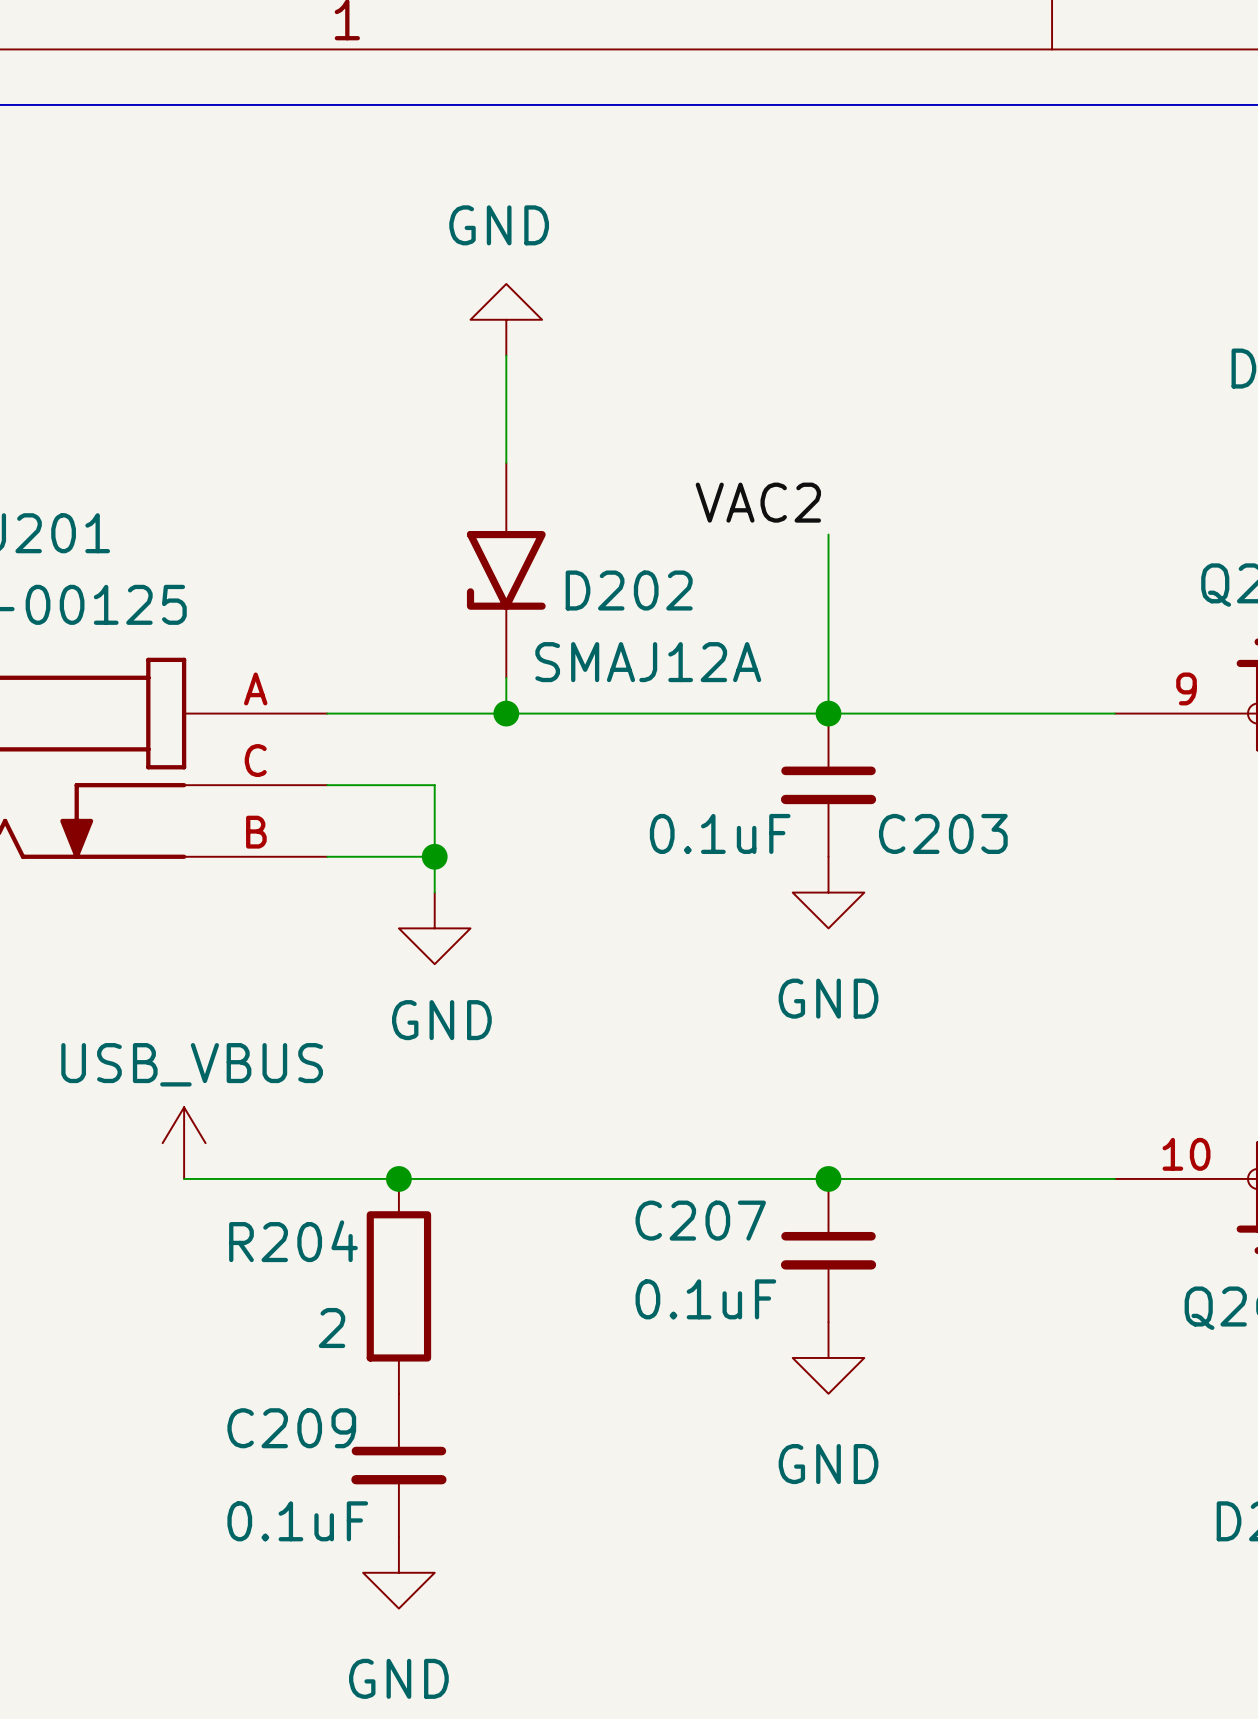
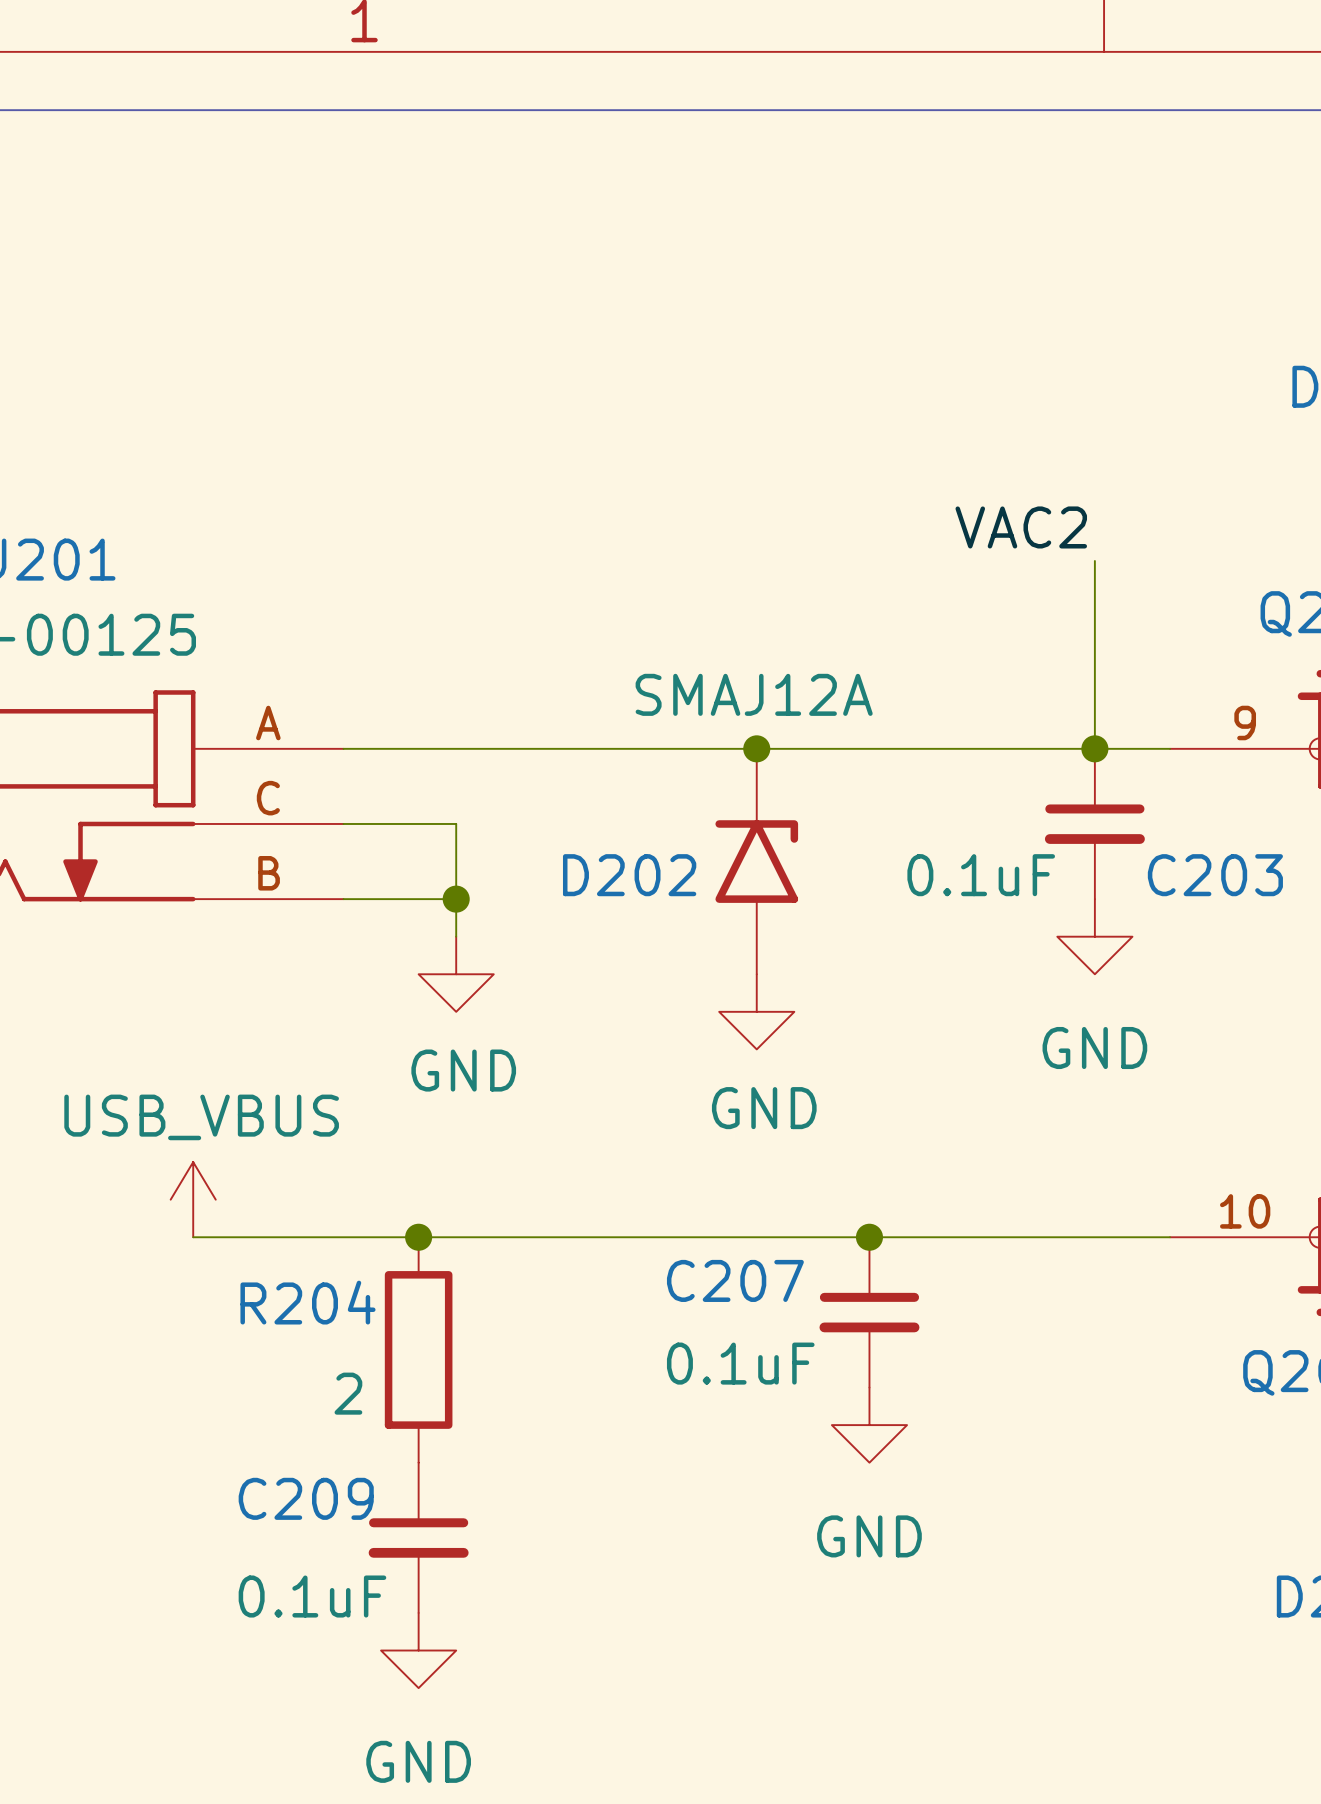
power symbol: GND (506, 319) -> none
wire: (506, 355) (506, 462) -> none
label position: VAC2 (758, 502) -> VAC2 (1021, 527)
wire: (828, 534) (828, 713) -> (1094, 561) (1094, 748)
D202 rotation: 0° (506, 570) -> 180° (756, 861)
D202 position: (506, 570) -> (756, 861)
D202 value position: SMAJ12A (648, 662) -> SMAJ12A (754, 694)
wire: (506, 677) (506, 713) -> none
junction: (506, 713) -> none
junction: none -> (756, 748)
junction: (828, 713) -> none
junction: none -> (1094, 748)
C203 position: (828, 785) -> (1094, 823)
power symbol: GND (828, 892) -> none
power symbol: none -> GND (1094, 936)
power symbol: none -> GND (756, 1011)

